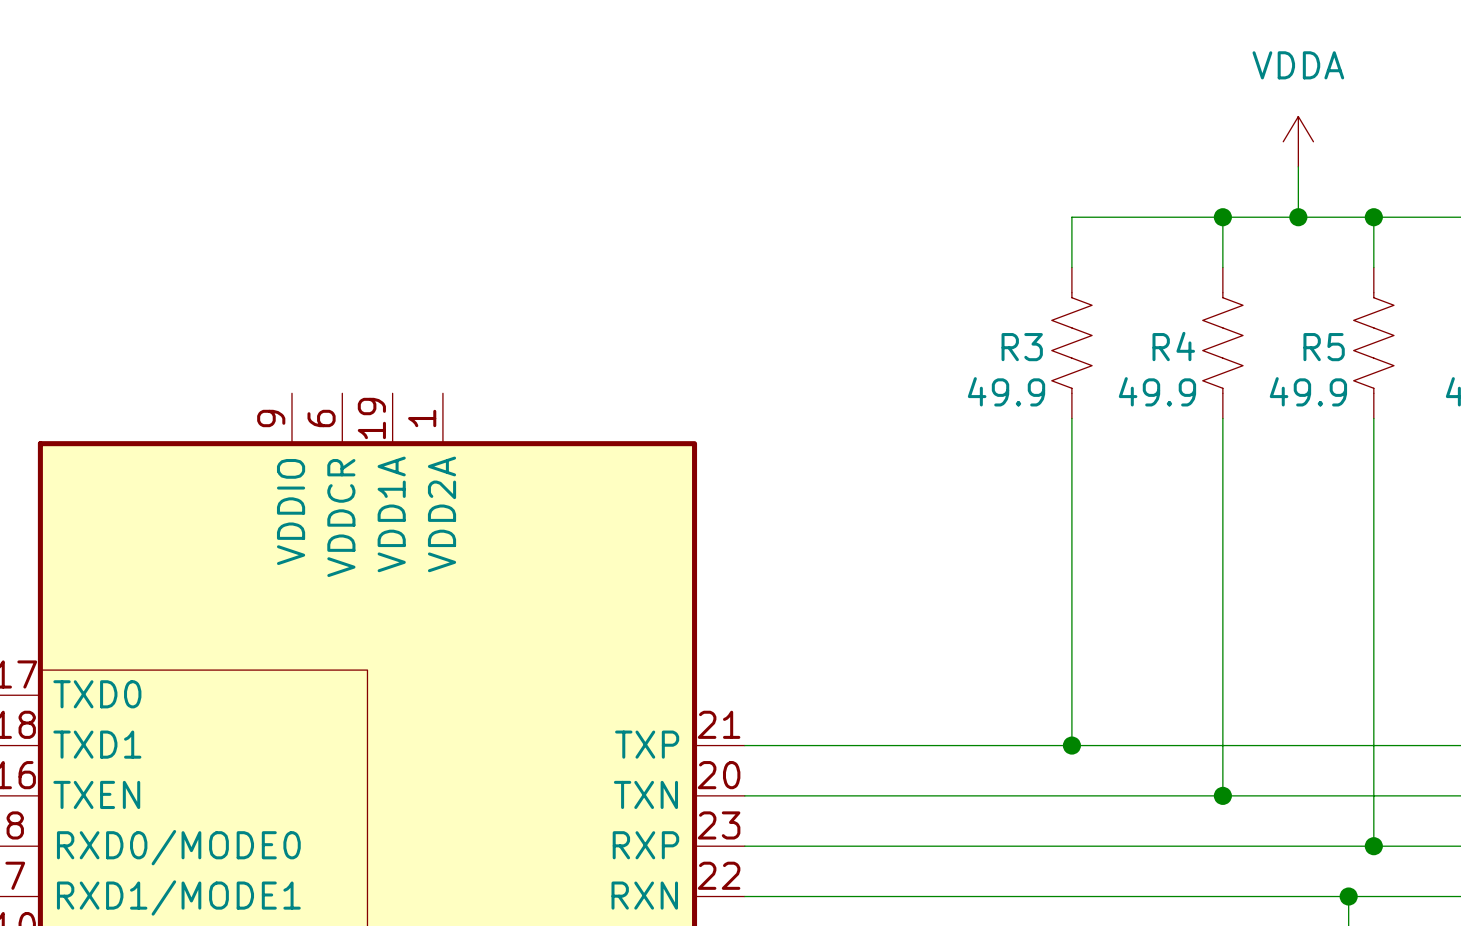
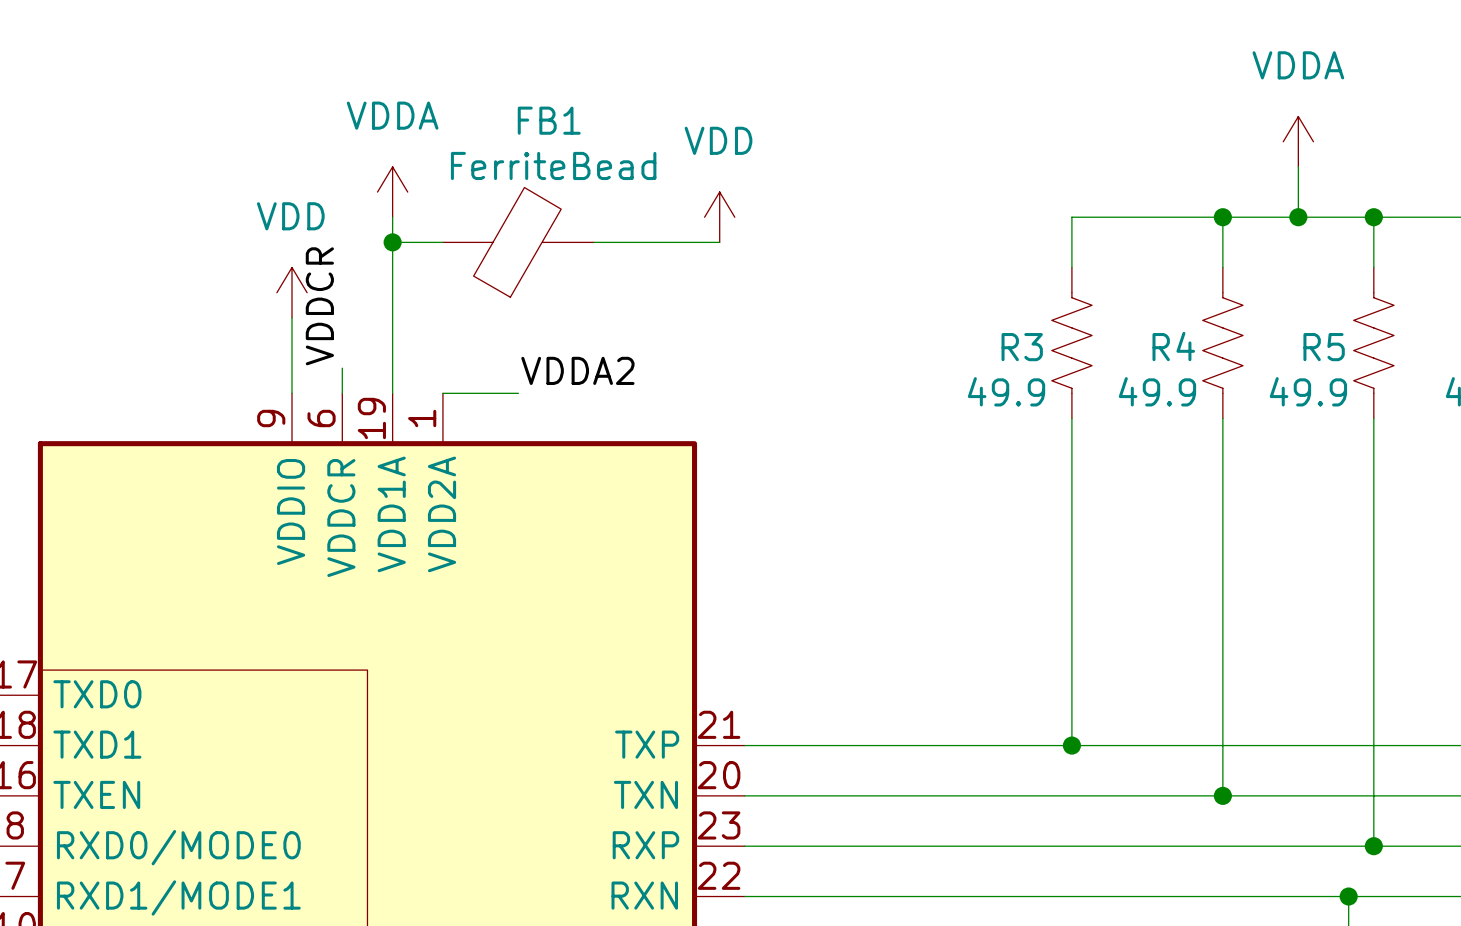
power symbol: none -> VDDA (392, 192)
wire: none -> (392, 217) (392, 393)
power symbol: none -> VDD (719, 217)
wire: none -> (392, 242) (442, 242)
junction: none -> (392, 242)
FB1: none -> FerriteBead (518, 242)
wire: none -> (593, 242) (719, 242)
power symbol: none -> VDD (291, 292)
label: none -> VDDCR (319, 306)
wire: none -> (291, 317) (291, 393)
wire: none -> (342, 368) (342, 393)
label: none -> VDDA2 (577, 370)
wire: none -> (442, 393) (518, 393)

